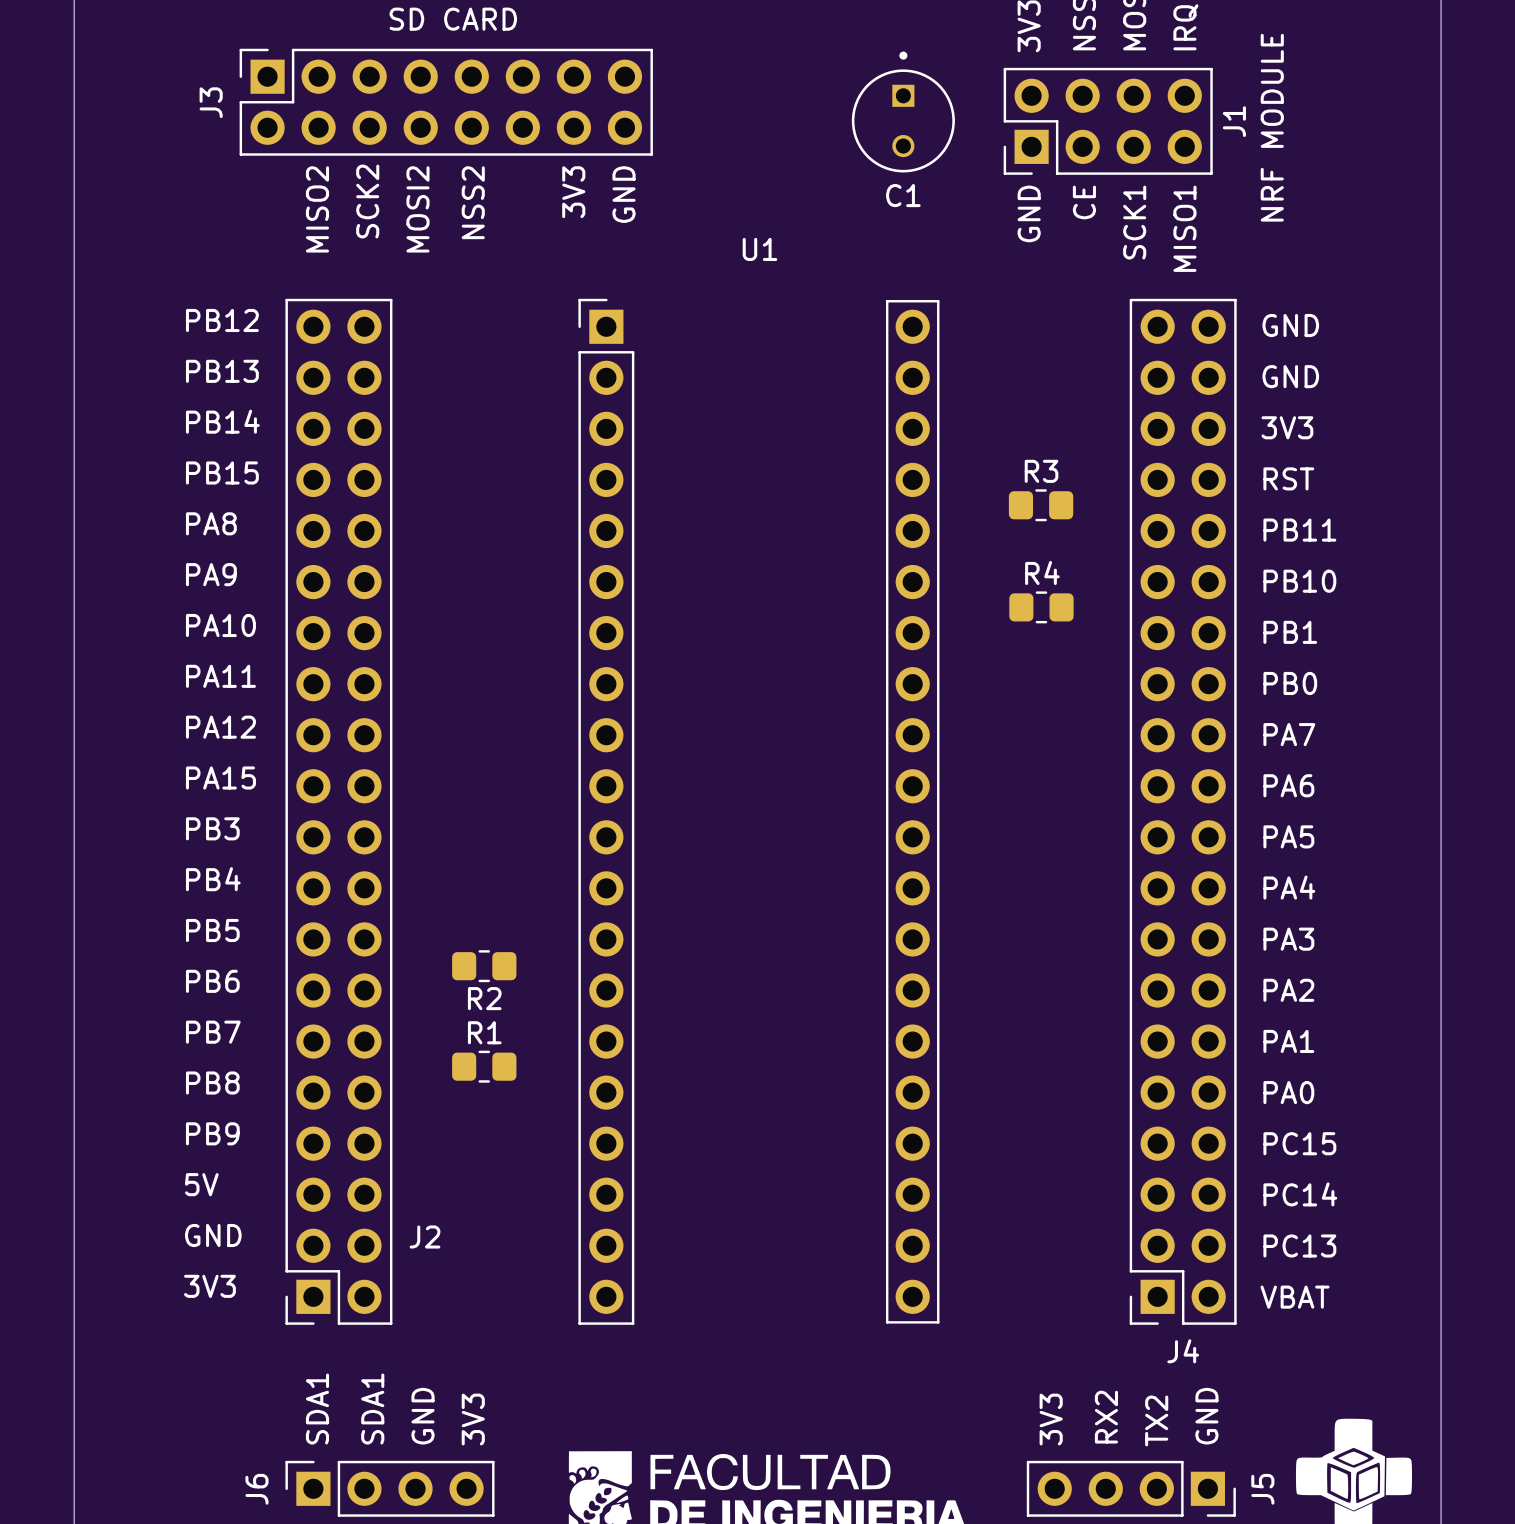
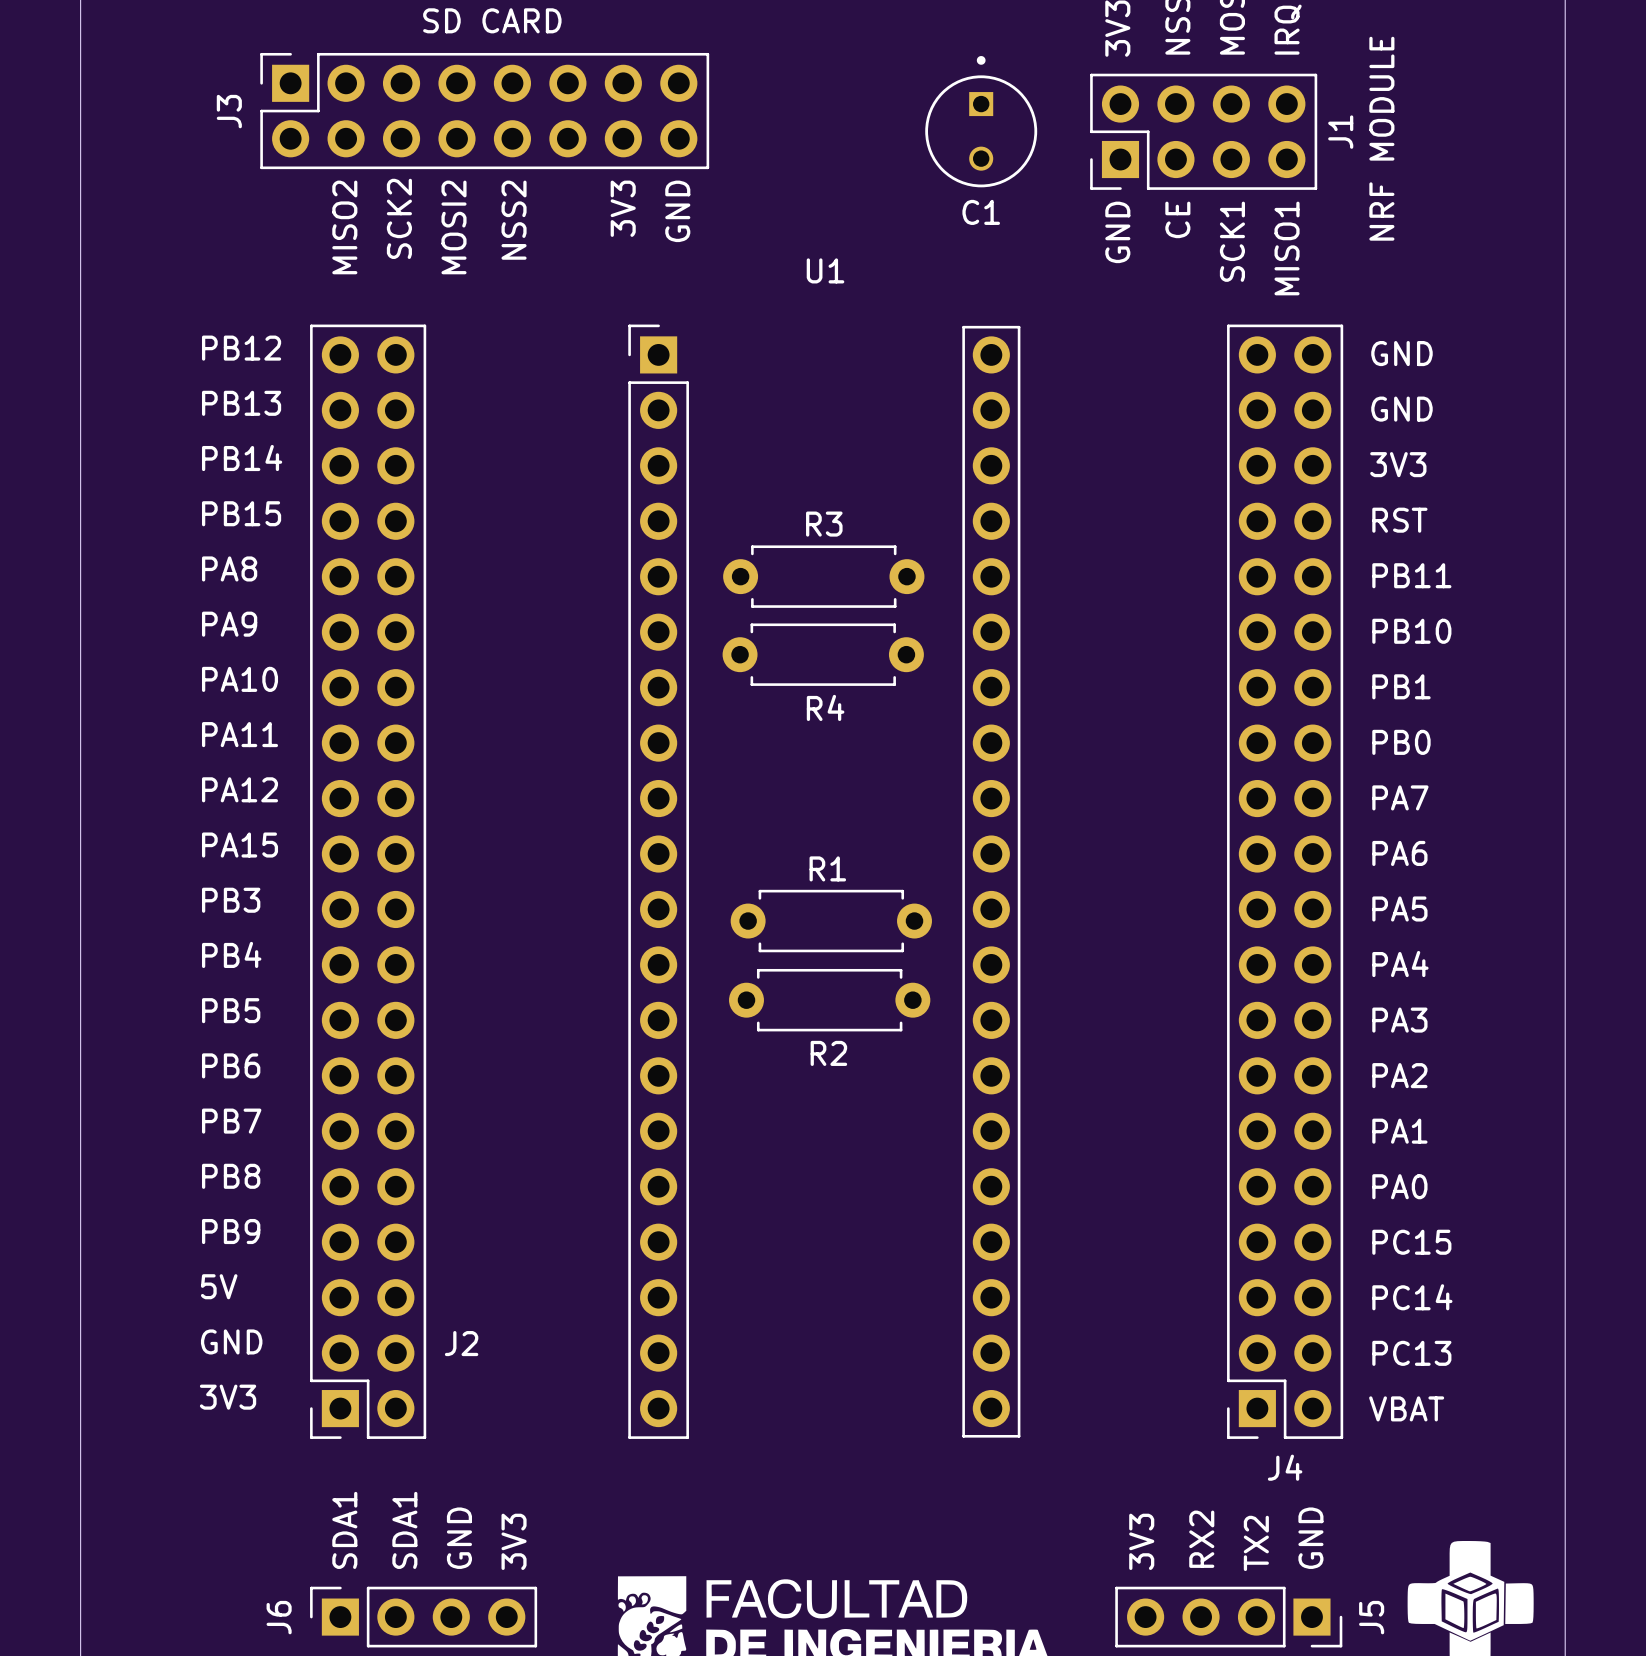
R3 footprint: [1008, 489, 1074, 522] -> [723, 545, 925, 608]
R4 name position: R4 (1042, 572) -> R4 (825, 707)
R4 footprint: [1009, 591, 1074, 624] -> [722, 623, 924, 686]
R2 footprint: [452, 950, 517, 983] -> [730, 889, 932, 953]
R2 name position: R2 (484, 998) -> R2 (828, 1053)
R1 name position: R1 (484, 1032) -> R1 (827, 868)
R1 footprint: [452, 1050, 517, 1083] -> [729, 968, 931, 1032]

